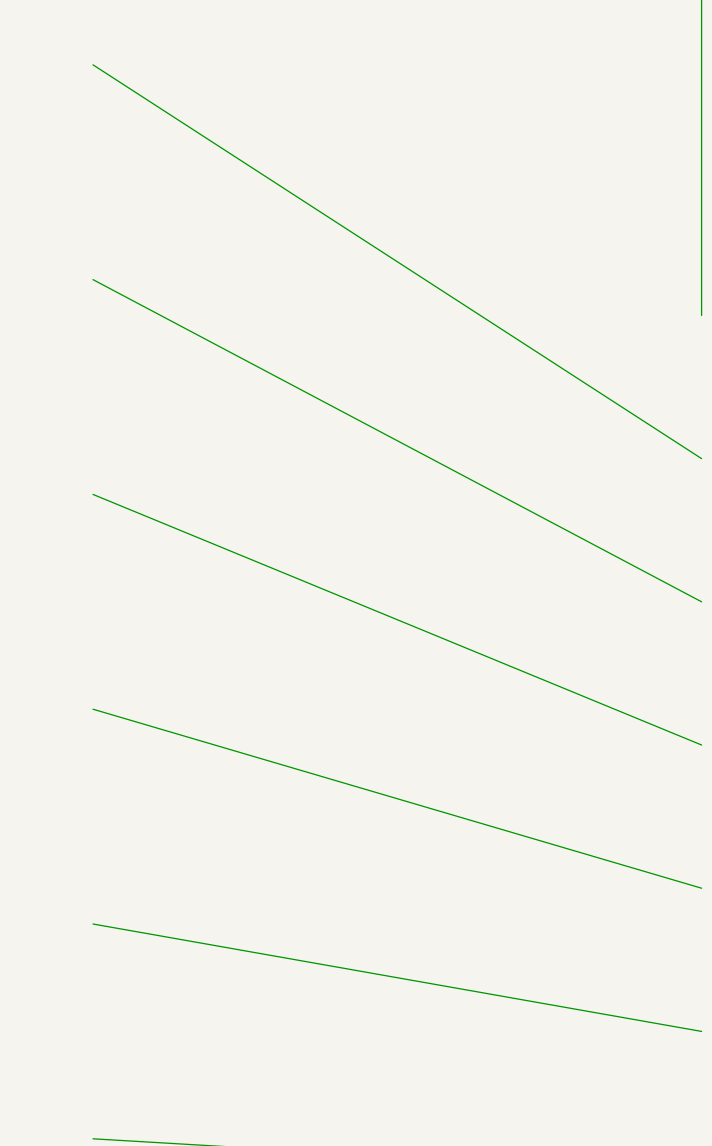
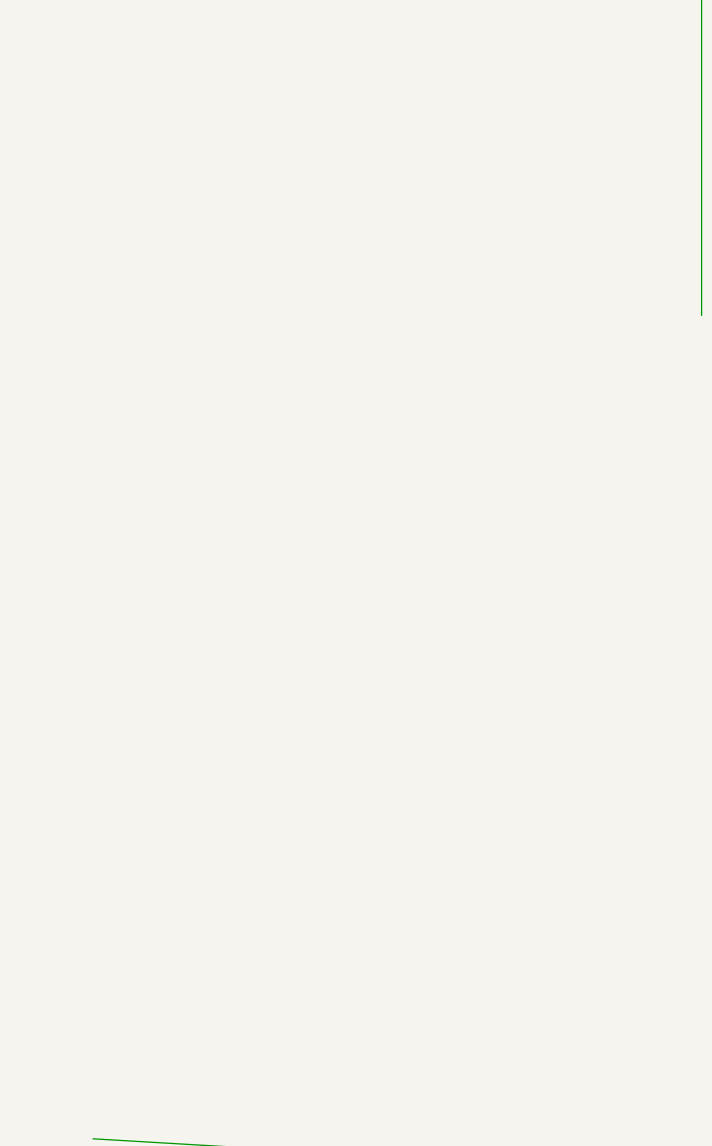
wire: (93, 64) (701, 458) -> none
wire: (93, 279) (701, 601) -> none
wire: (93, 494) (701, 745) -> none
wire: (93, 709) (701, 888) -> none
wire: (93, 924) (701, 1031) -> none

